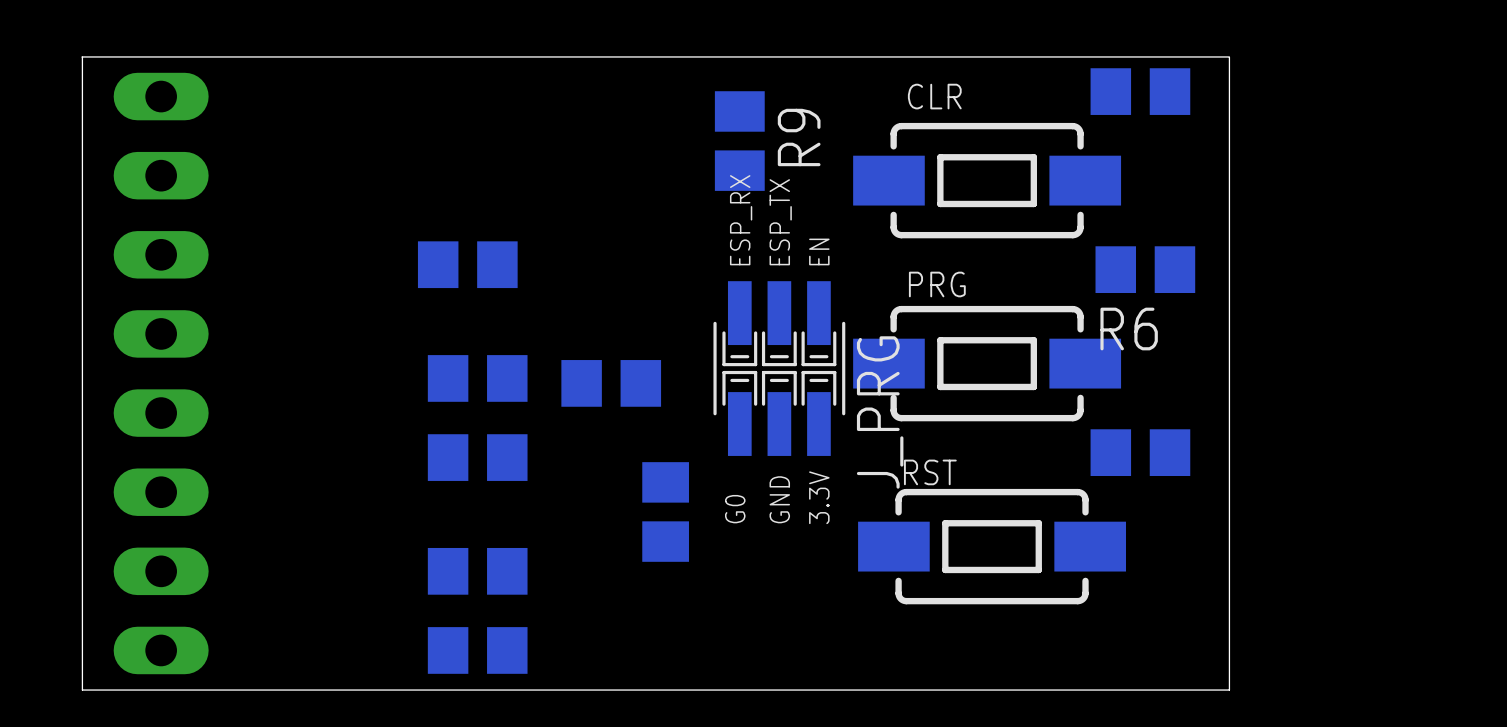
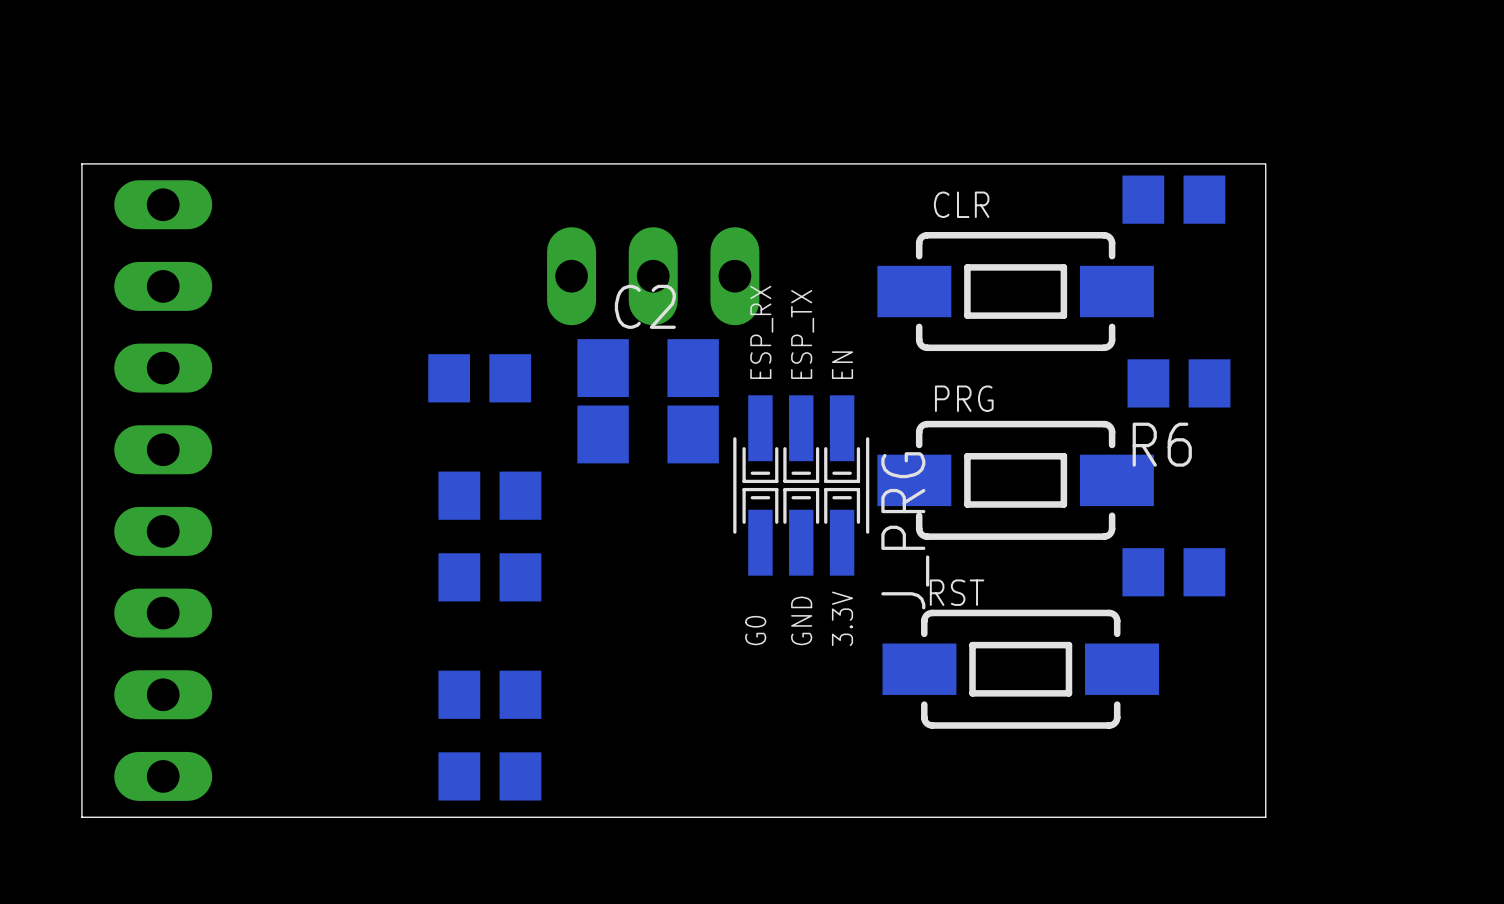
R9: (739, 141) -> none
part: none -> (653, 276)
C2: none -> (648, 368)
part: none -> (648, 434)
part: (611, 383) -> none
part: (665, 511) -> none

